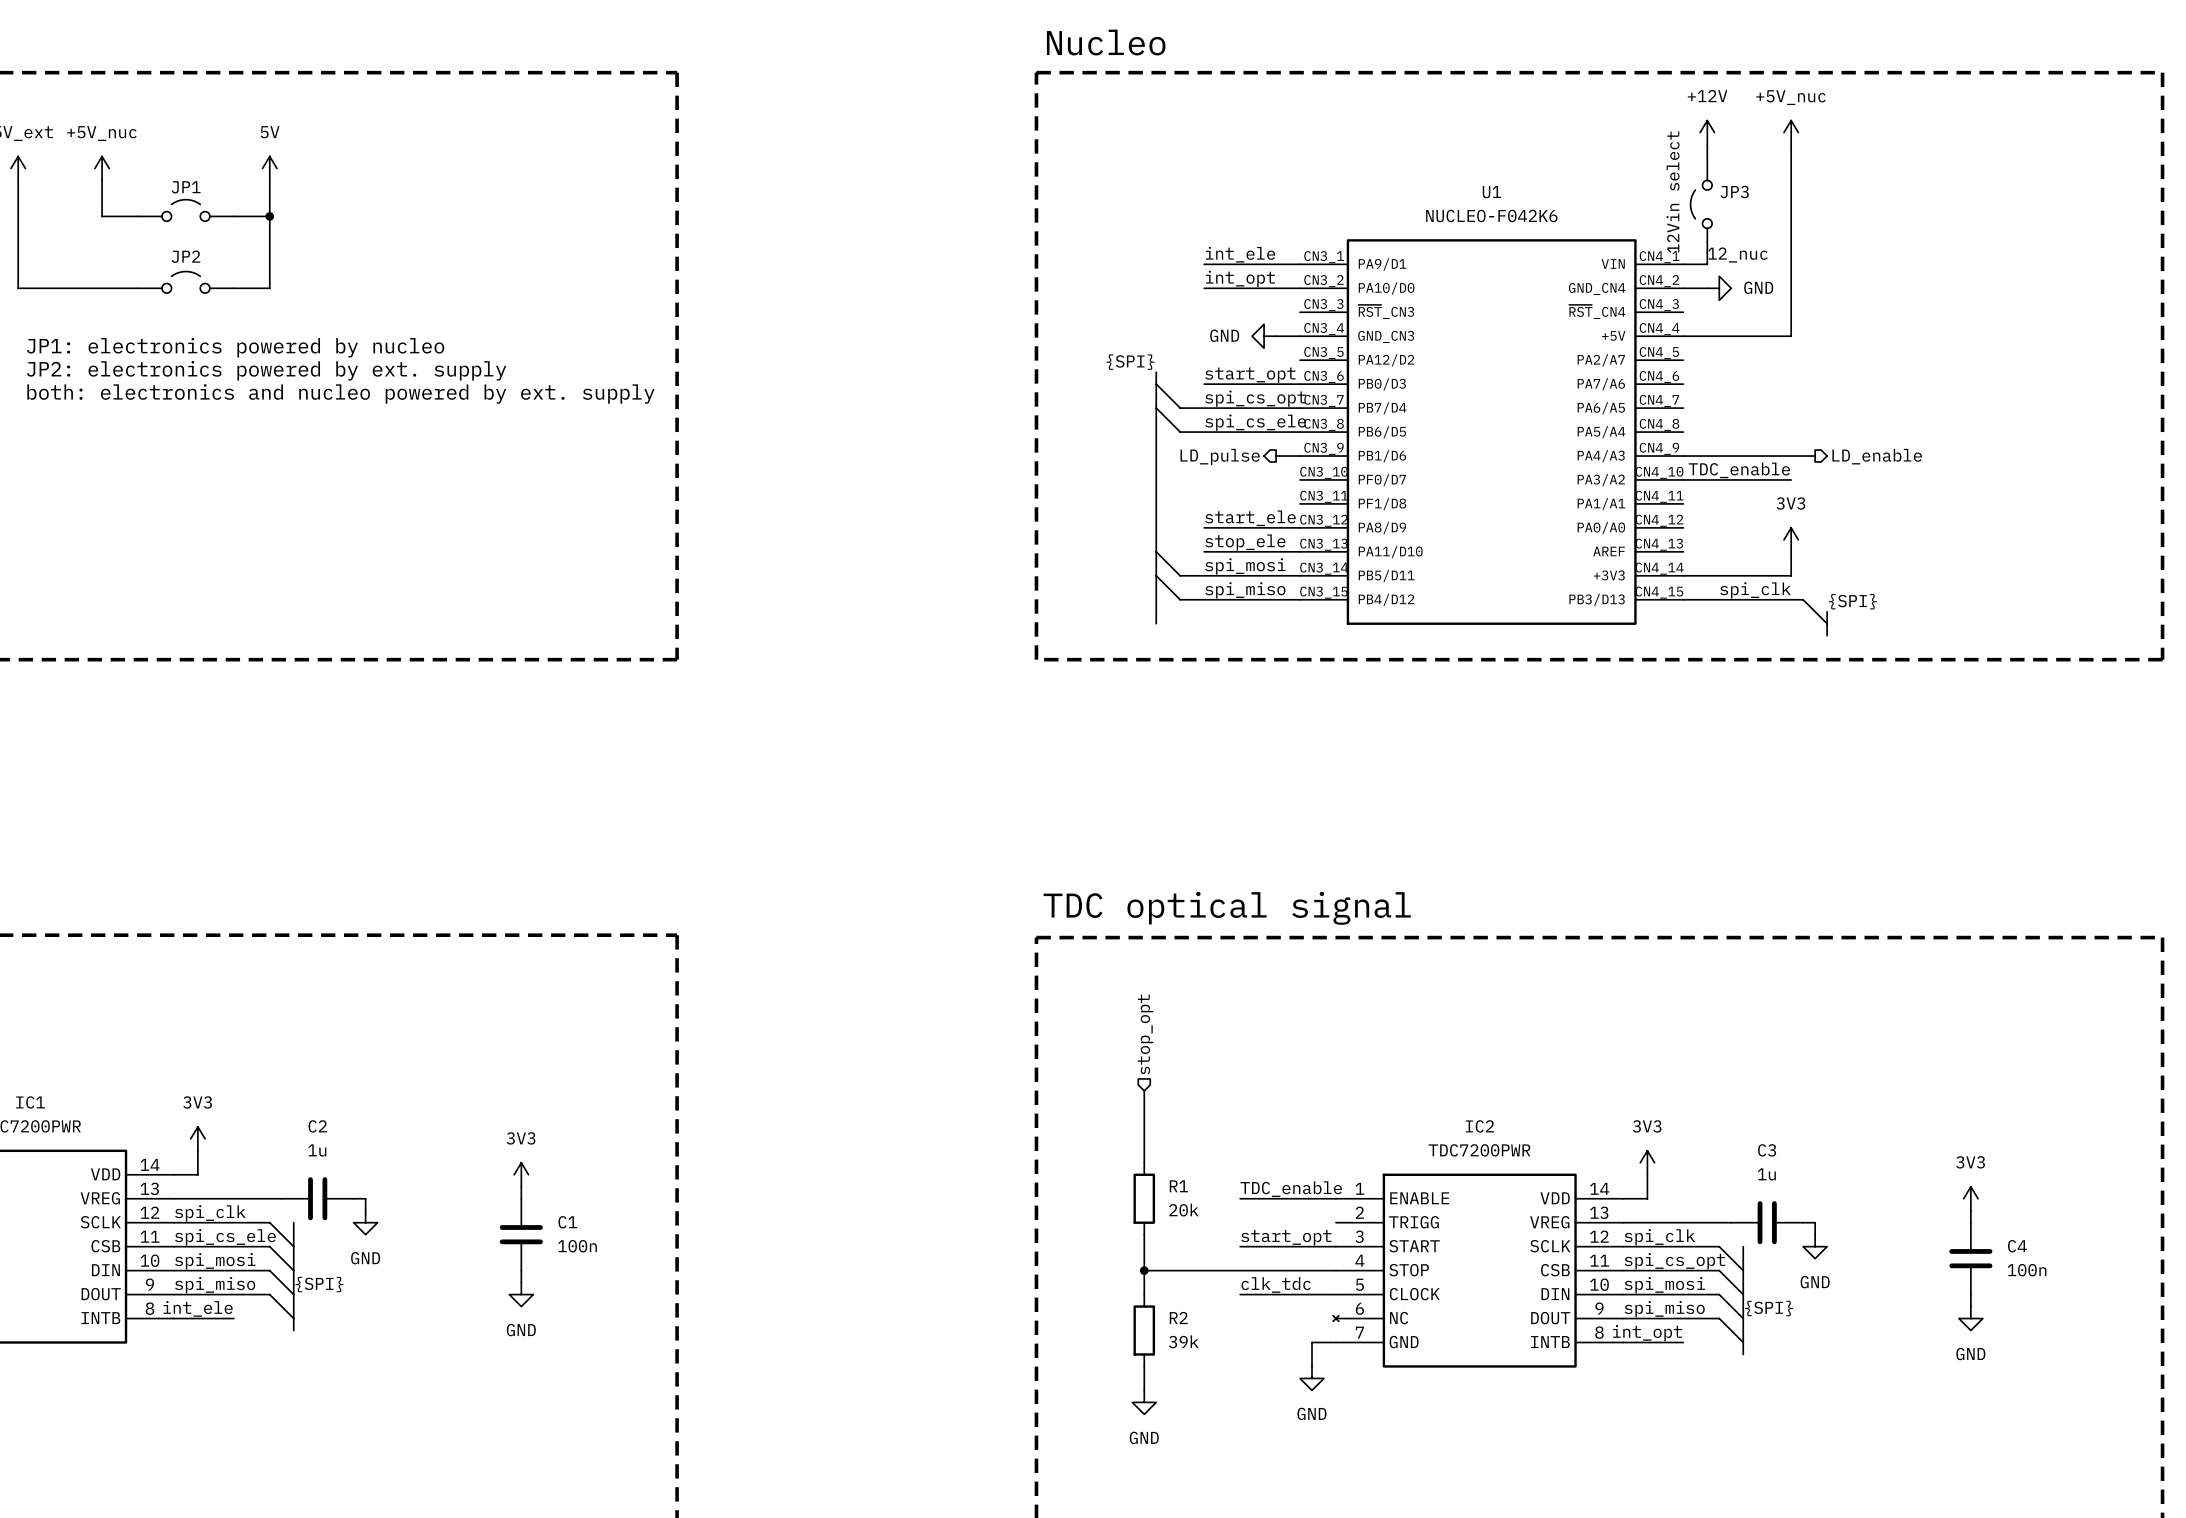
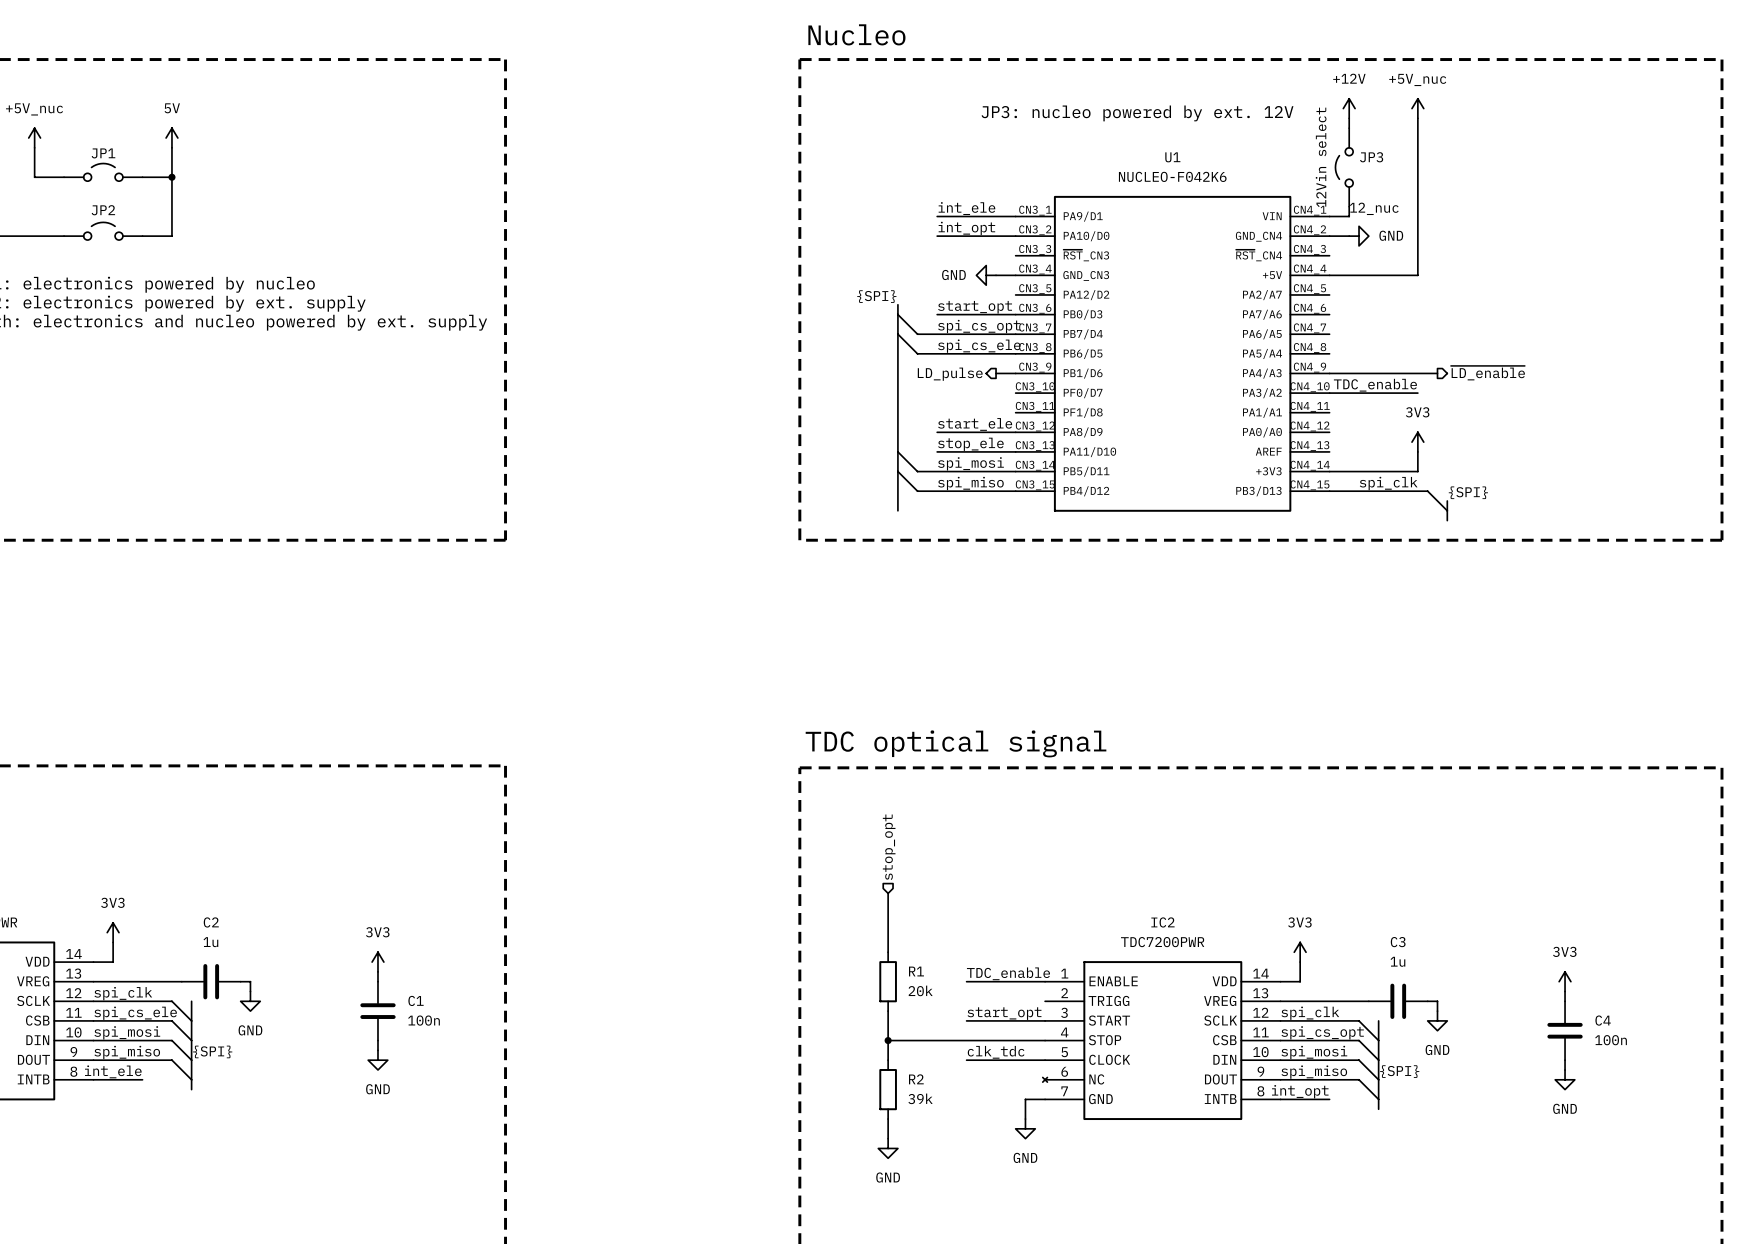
text: none -> JP3: nucleo powered by ext. 12V (1137, 113)
hierarchical label: LD_enable (1877, 456) -> ~{LD_enable} (1487, 373)

